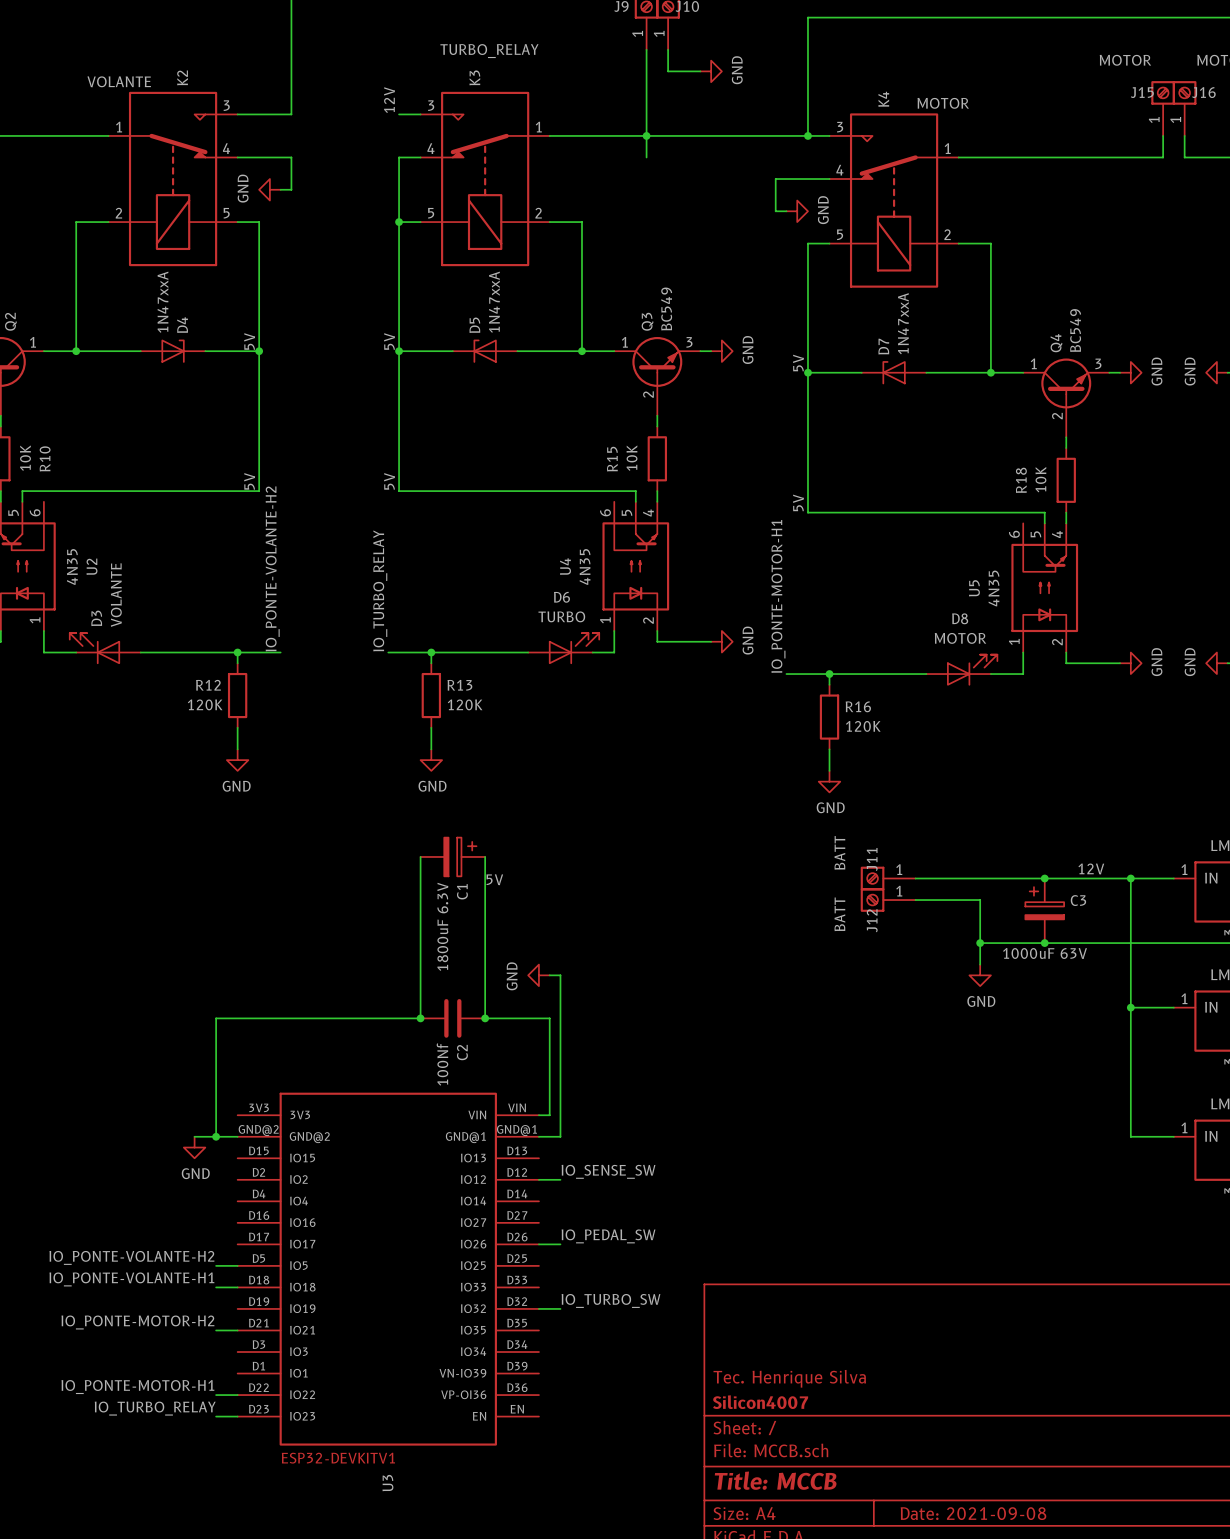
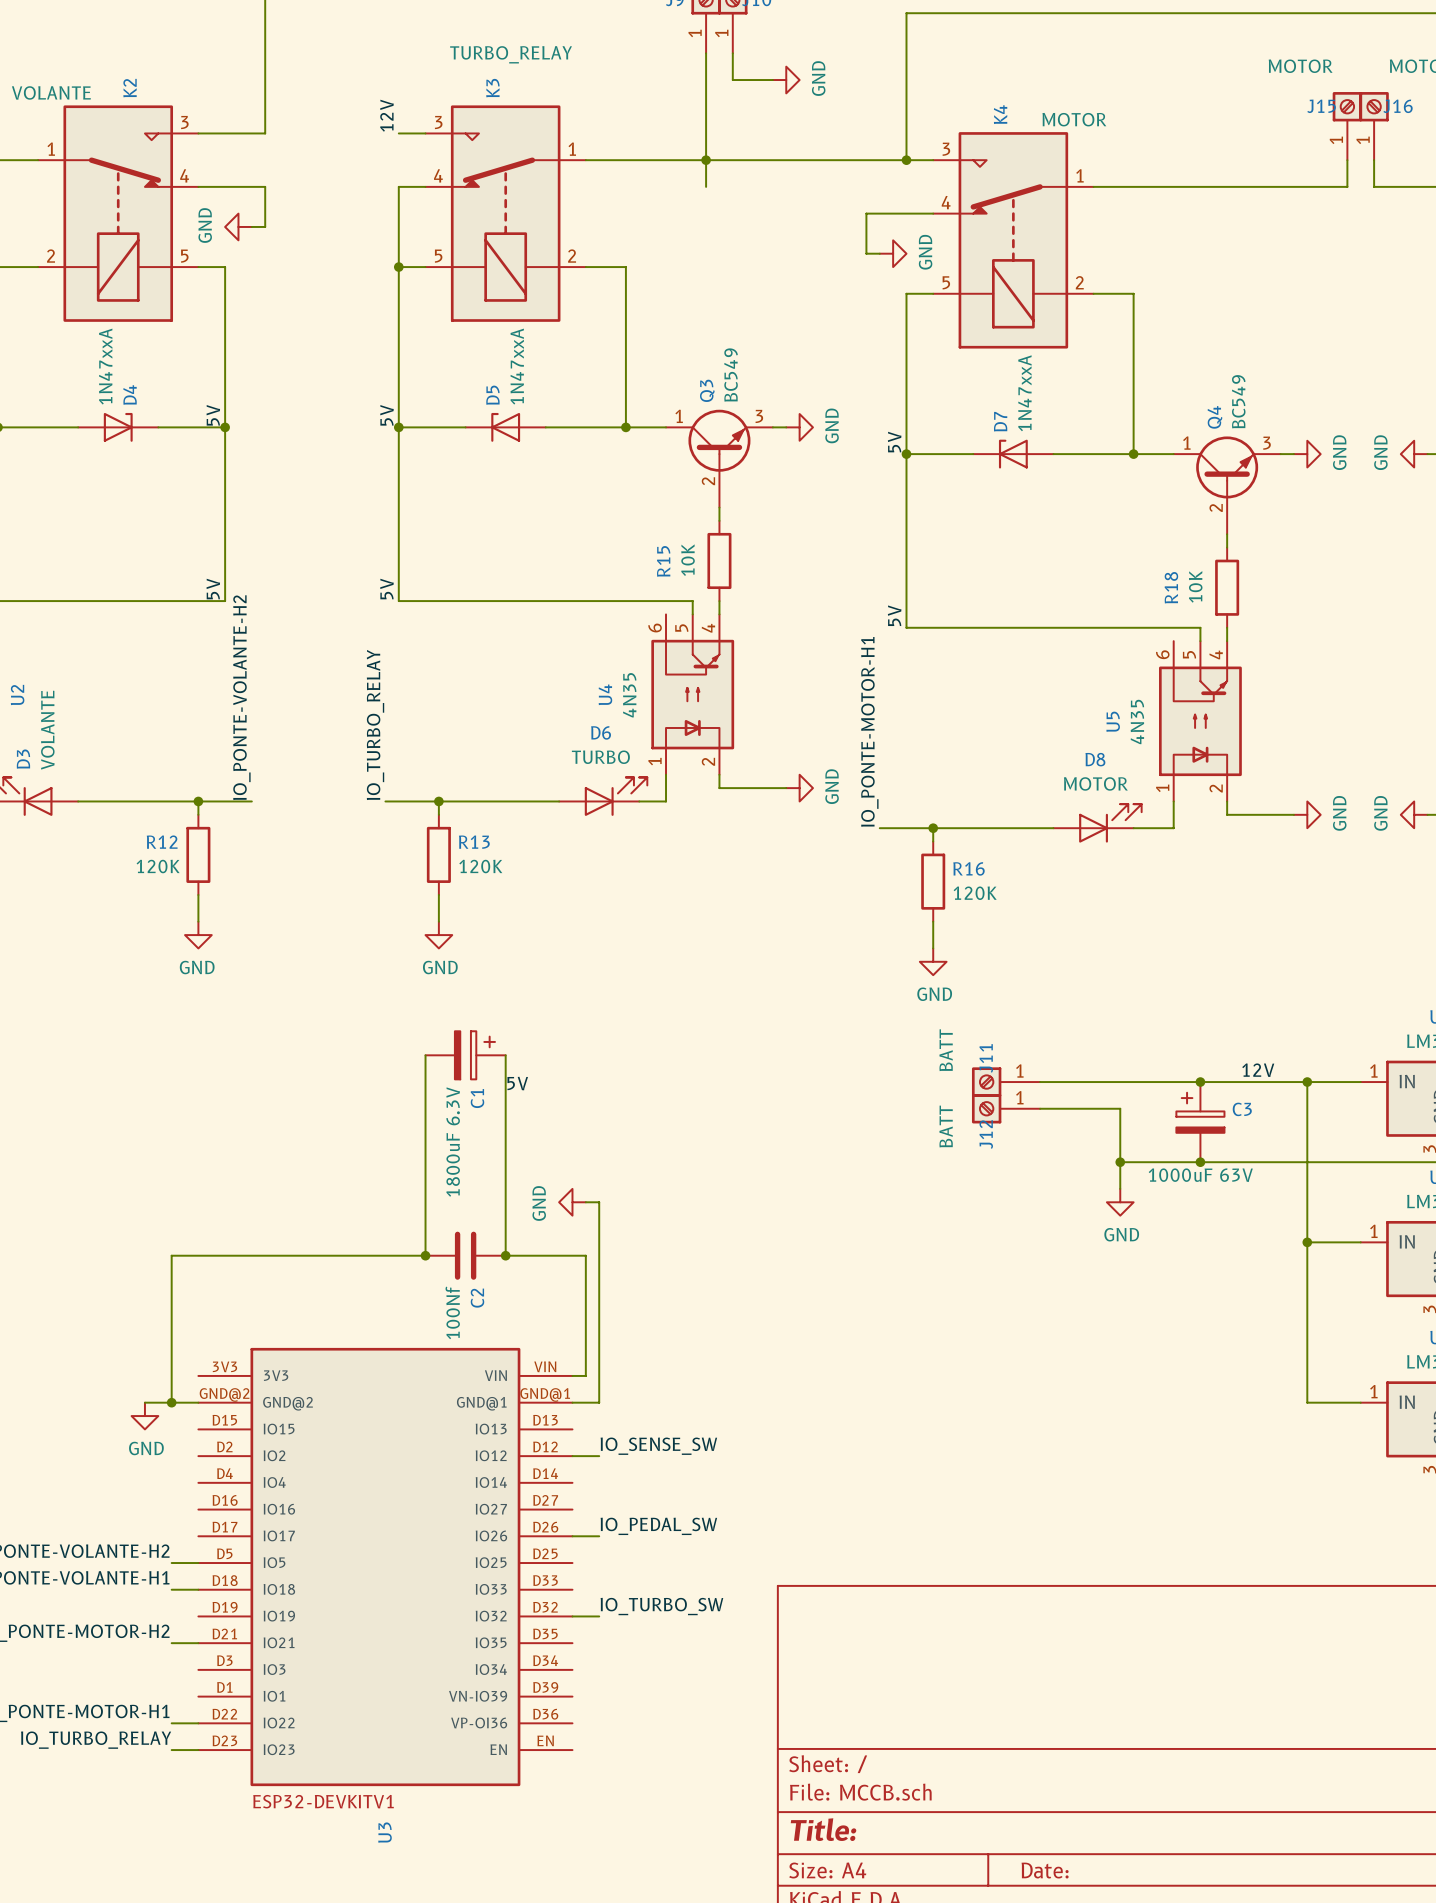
title block: Tec. Henrique Silva (789, 1378) -> none
title block: Silicon4007 (760, 1402) -> none
title block: Title: MCCB (775, 1480) -> Title: (823, 1829)
title block: Date: 2021-09-08 (973, 1513) -> Date: (1045, 1870)

